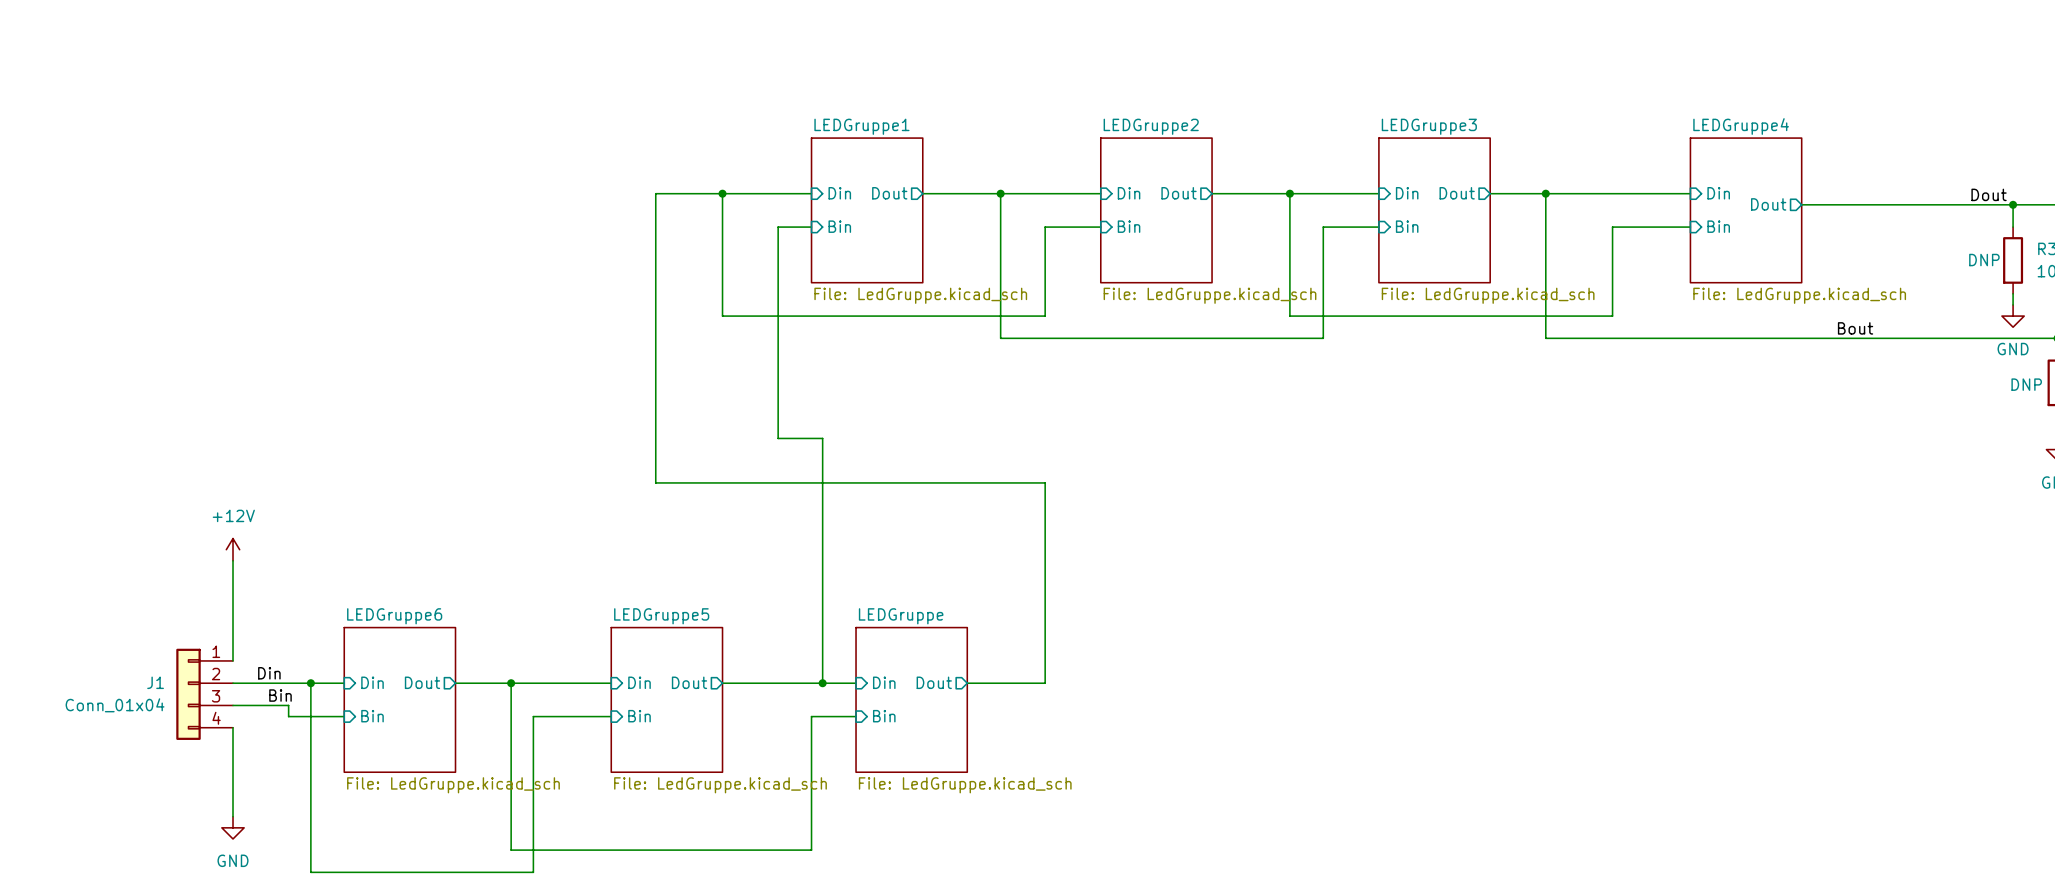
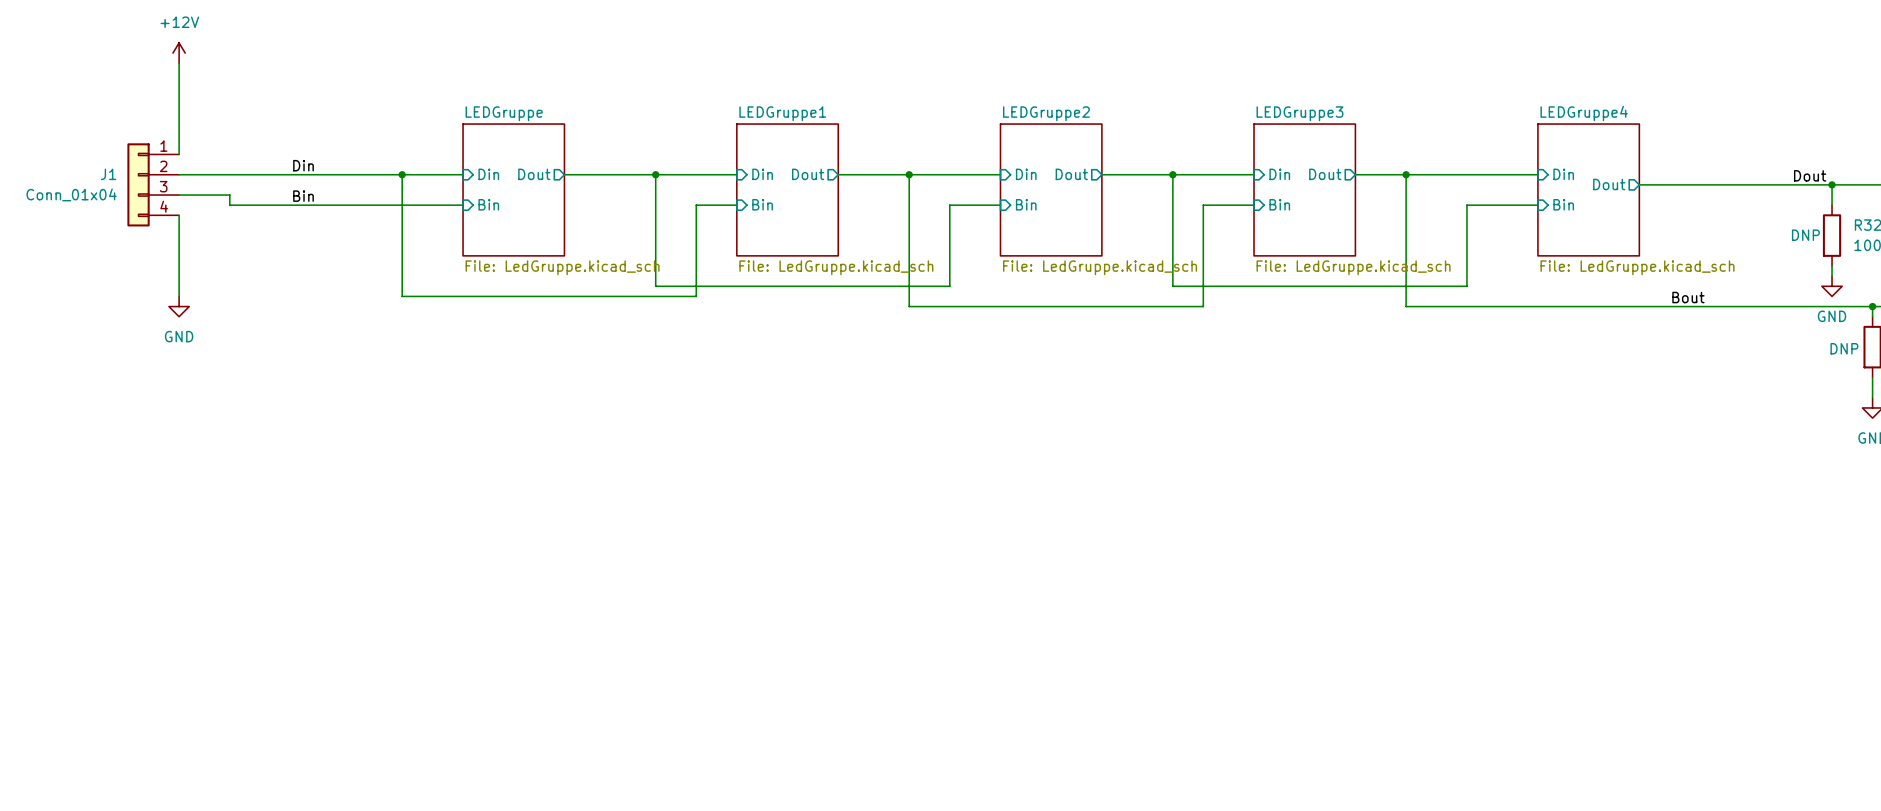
power symbol: none -> +12V (179, 53)
wire: none -> (179, 63) (179, 154)
label: none -> Din (303, 165)
wire: none -> (179, 174) (463, 174)
junction: none -> (402, 174)
sheet pin: none -> Din (488, 174)
sheet pin: none -> Dout (534, 174)
wire: (655, 193) (655, 482) (1045, 482) (1045, 683) (967, 683) -> (594, 174) (564, 174)
sheet LEDGruppe: none -> File: LedGruppe.kicad_sch (513, 189)
wire: none -> (179, 195) (229, 195) (229, 205) (463, 205)
label: none -> Bin (303, 196)
sheet pin: none -> Bin (488, 204)
wire: (778, 227) (778, 438) (822, 438) (822, 683) -> (706, 205) (696, 205) (696, 296) (402, 296) (402, 174)
wire: none -> (179, 215) (179, 296)
power symbol: none -> GND (179, 306)
power symbol: +12V (233, 549) -> none
wire: (233, 560) (233, 660) -> none
label: Din (269, 673) -> none
sheet pin: Din (372, 682) -> none
sheet pin: Dout (422, 682) -> none
sheet pin: Din (639, 682) -> none
sheet pin: Dout (689, 682) -> none
sheet pin: Din (884, 682) -> none
sheet pin: Dout (934, 682) -> none
wire: (233, 683) (344, 683) -> none
wire: (310, 683) (310, 872) (533, 872) (533, 716) (611, 716) -> none
junction: (310, 683) -> none
wire: (455, 683) (611, 683) -> none
wire: (511, 683) (511, 850) (811, 850) (811, 716) (856, 716) -> none
junction: (511, 683) -> none
wire: (722, 683) (856, 683) -> none
junction: (822, 683) -> none
J1 position: (204, 694) -> (153, 184)
label: Bin (280, 695) -> none
sheet LEDGruppe6: File: LedGruppe.kicad_sch (399, 699) -> none
sheet LEDGruppe5: File: LedGruppe.kicad_sch (666, 699) -> none
sheet LEDGruppe: File: LedGruppe.kicad_sch (911, 699) -> none
wire: (233, 705) (288, 705) (288, 716) (344, 716) -> none
sheet pin: Bin (372, 716) -> none
sheet pin: Bin (639, 716) -> none
sheet pin: Bin (884, 716) -> none
wire: (233, 727) (233, 816) -> none
power symbol: GND (233, 827) -> none

